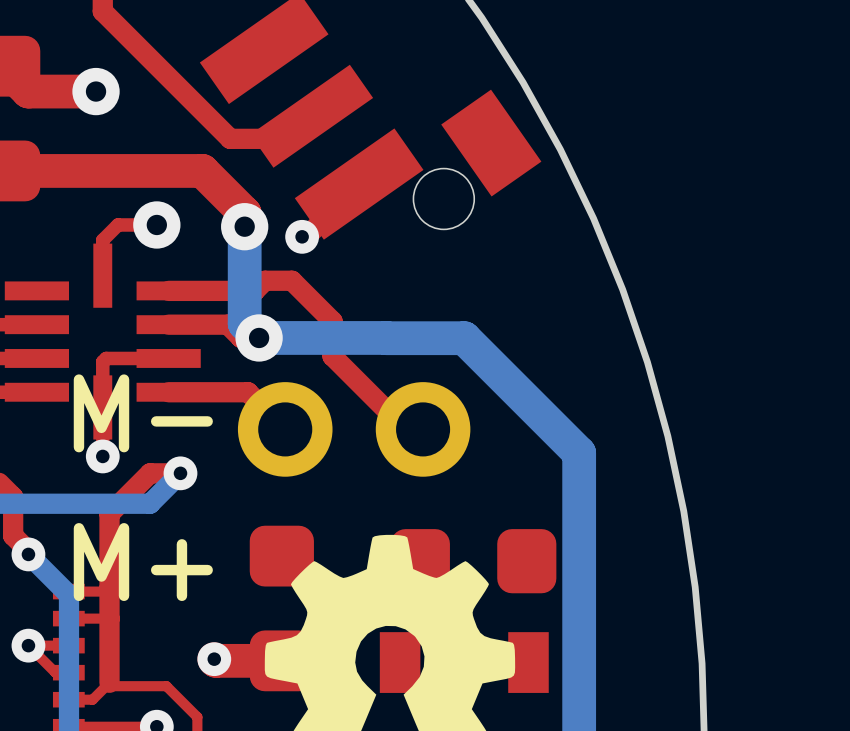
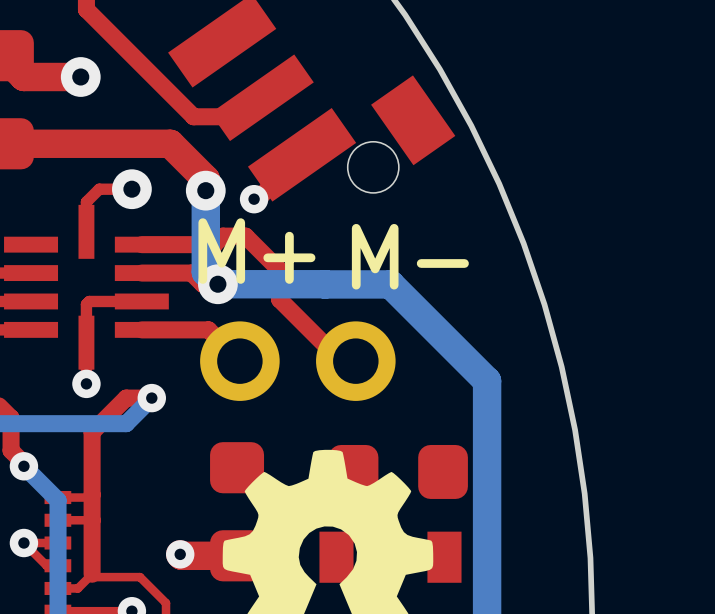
text position: M- (143, 413) -> M- (410, 256)
text position: M+ (143, 562) -> M+ (256, 251)

